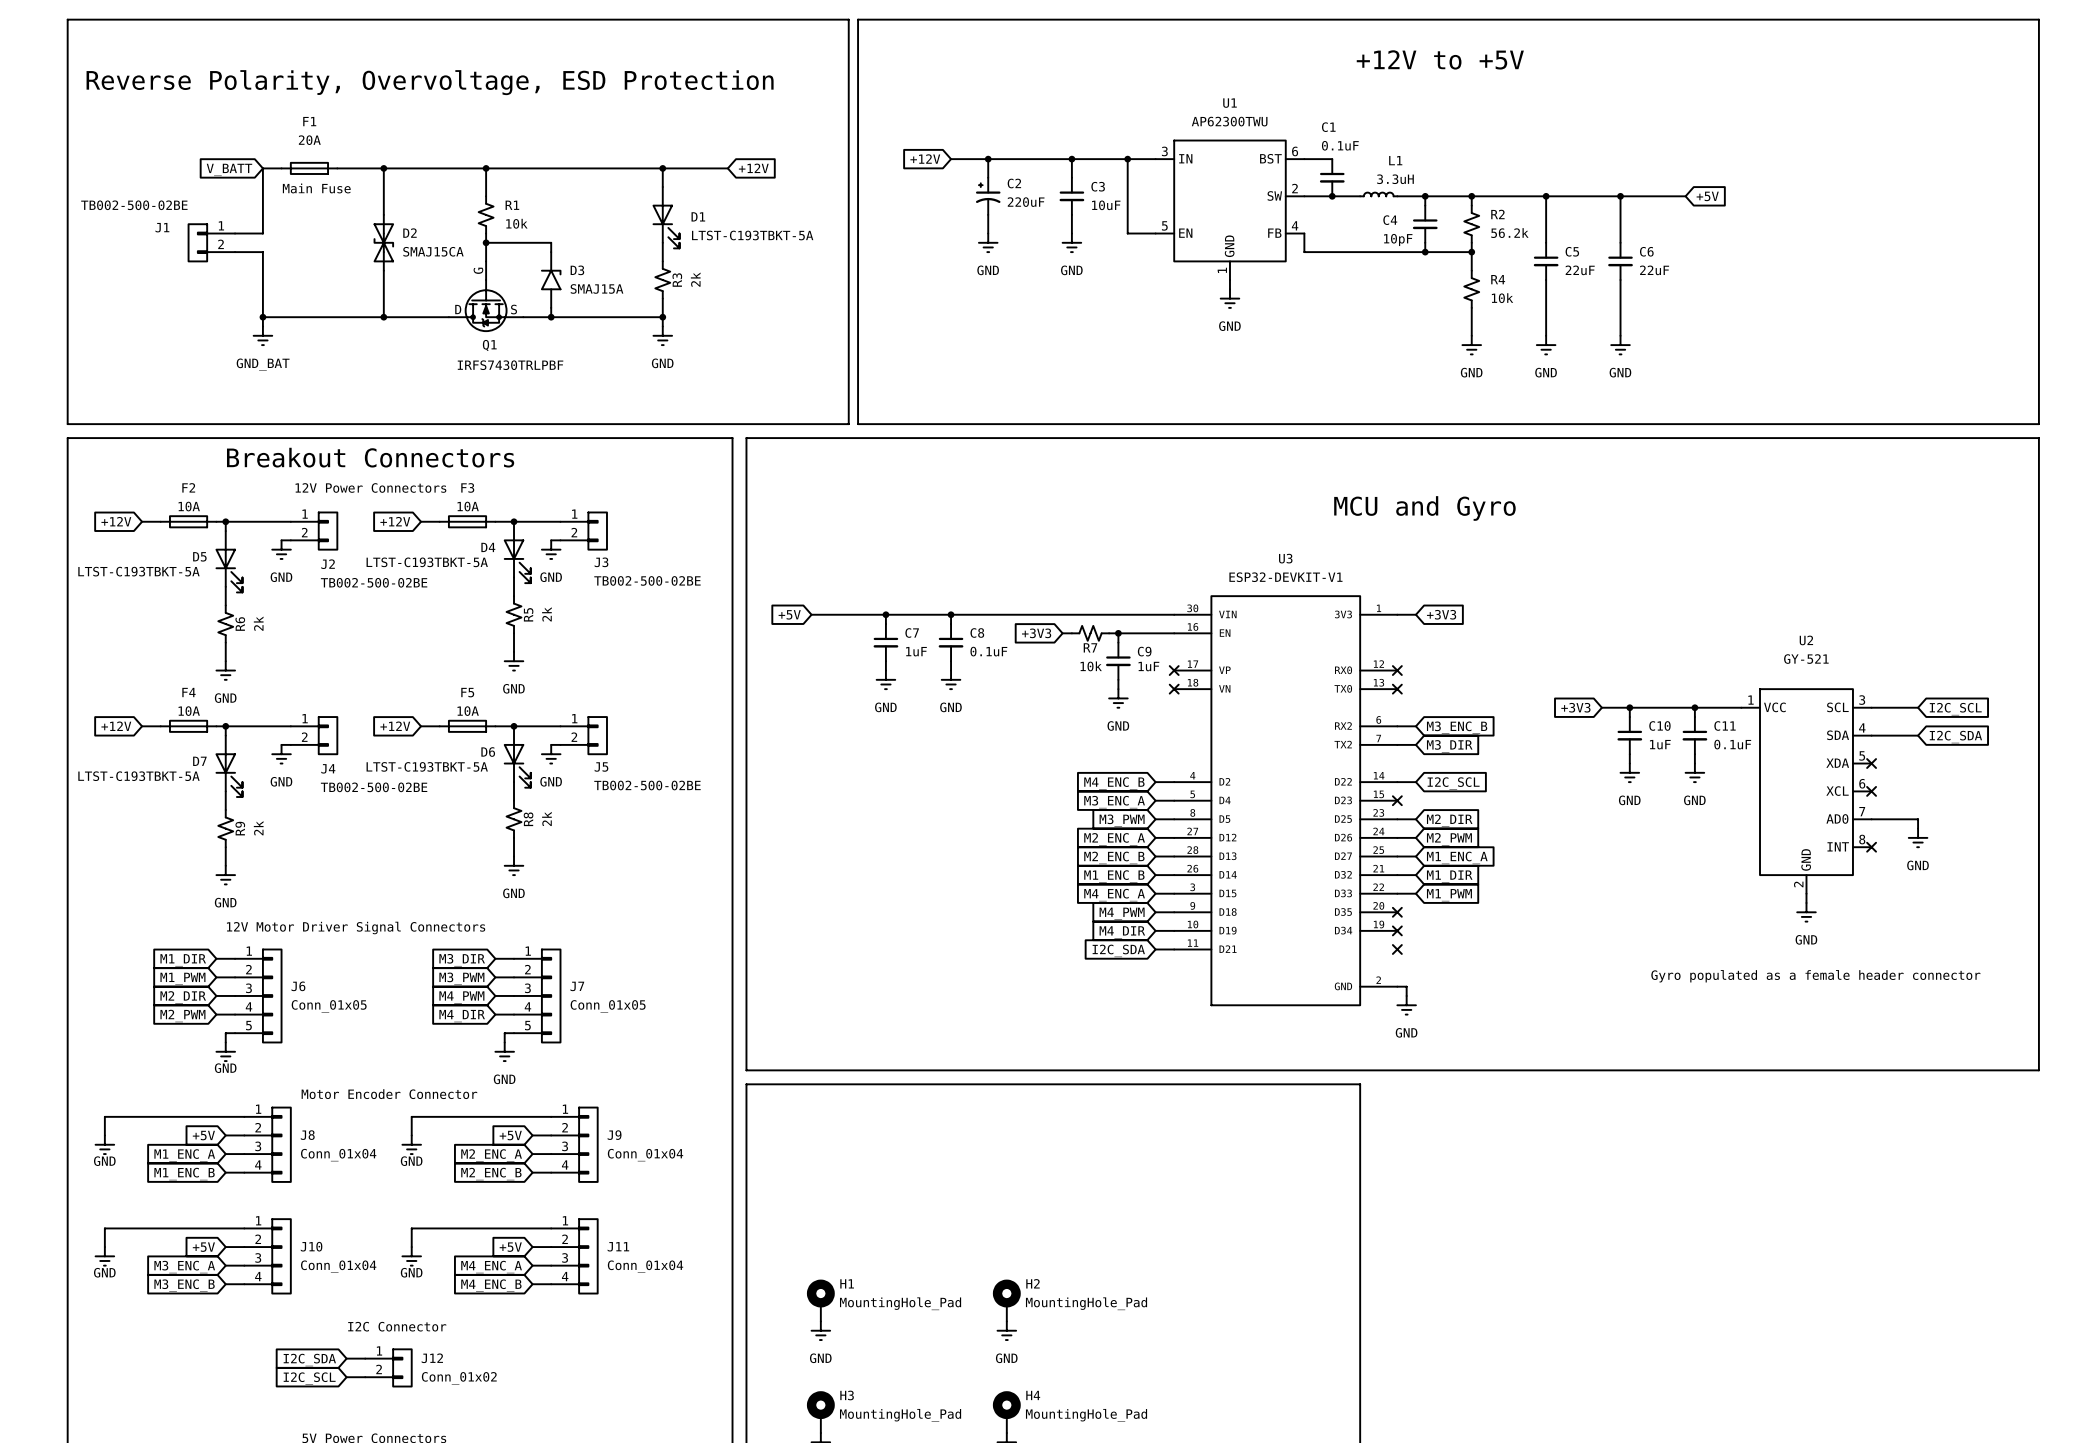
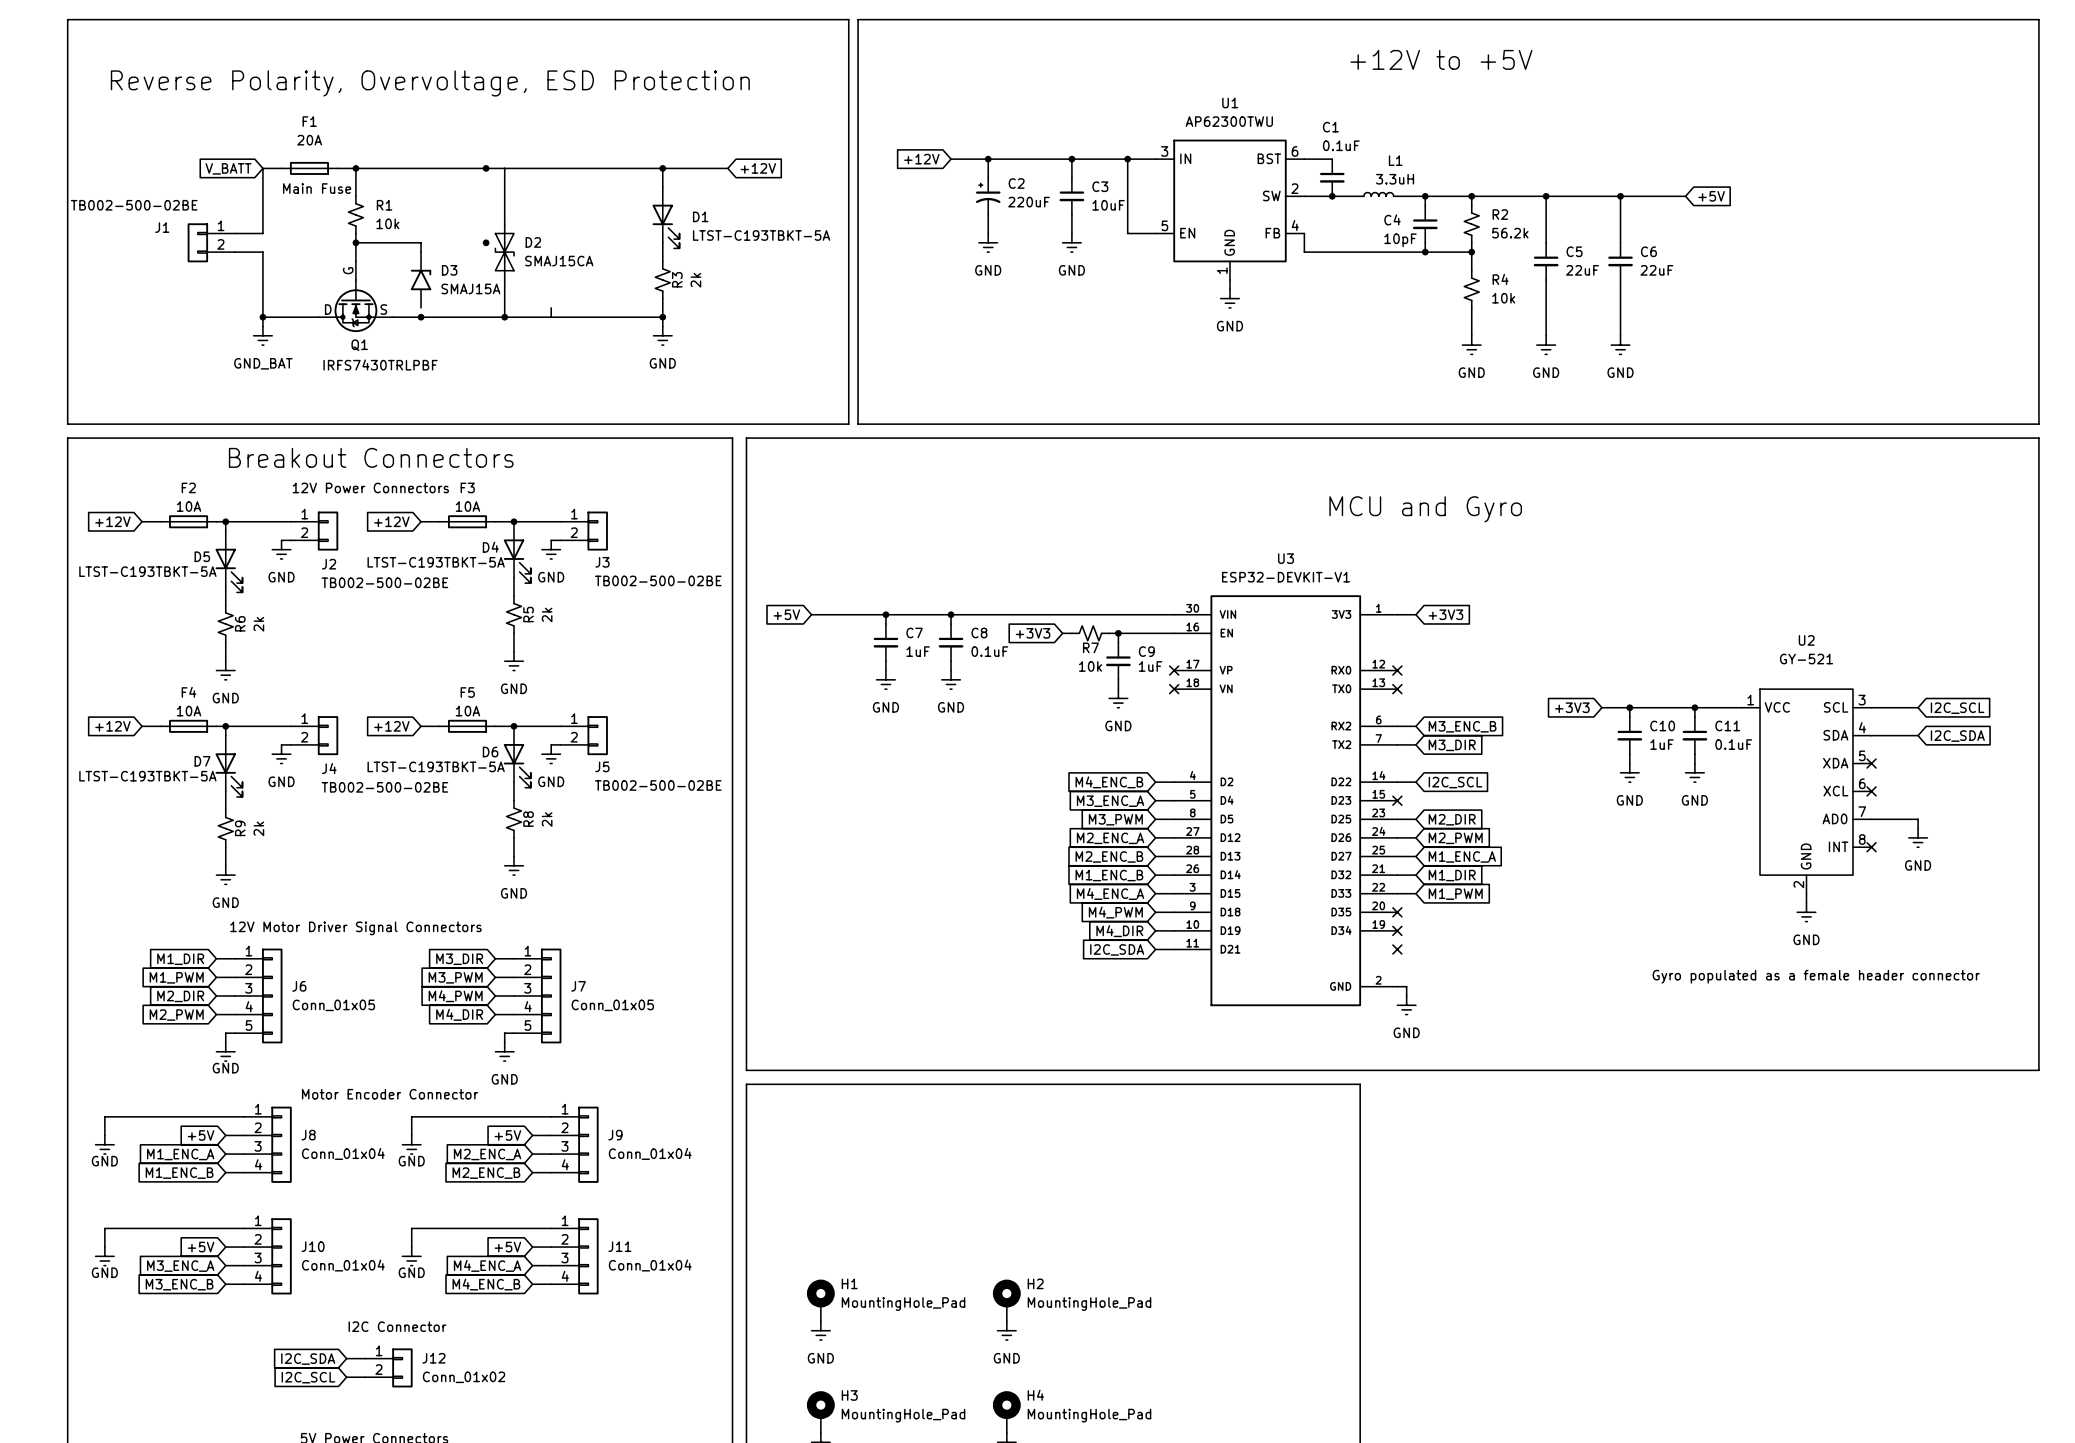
wire: (383, 168) (383, 214) -> none
junction position: (383, 168) -> (355, 168)
wire: (486, 168) (486, 196) -> (355, 168) (355, 196)
wire: none -> (504, 168) (504, 224)
R1 position: (486, 214) -> (355, 214)
wire: (486, 233) (486, 261) -> (355, 233) (355, 261)
junction: none -> (355, 242)
D2 position: (383, 242) -> (504, 252)
wire: (486, 242) (551, 242) (551, 252) -> (355, 242) (421, 242) (421, 252)
wire: (383, 270) (383, 317) -> none
wire: none -> (504, 280) (504, 317)
D3 position: (551, 280) -> (421, 280)
Q1 position: (486, 296) -> (355, 296)
junction position: (383, 317) -> (421, 317)
junction: none -> (504, 317)
junction: (551, 317) -> none

